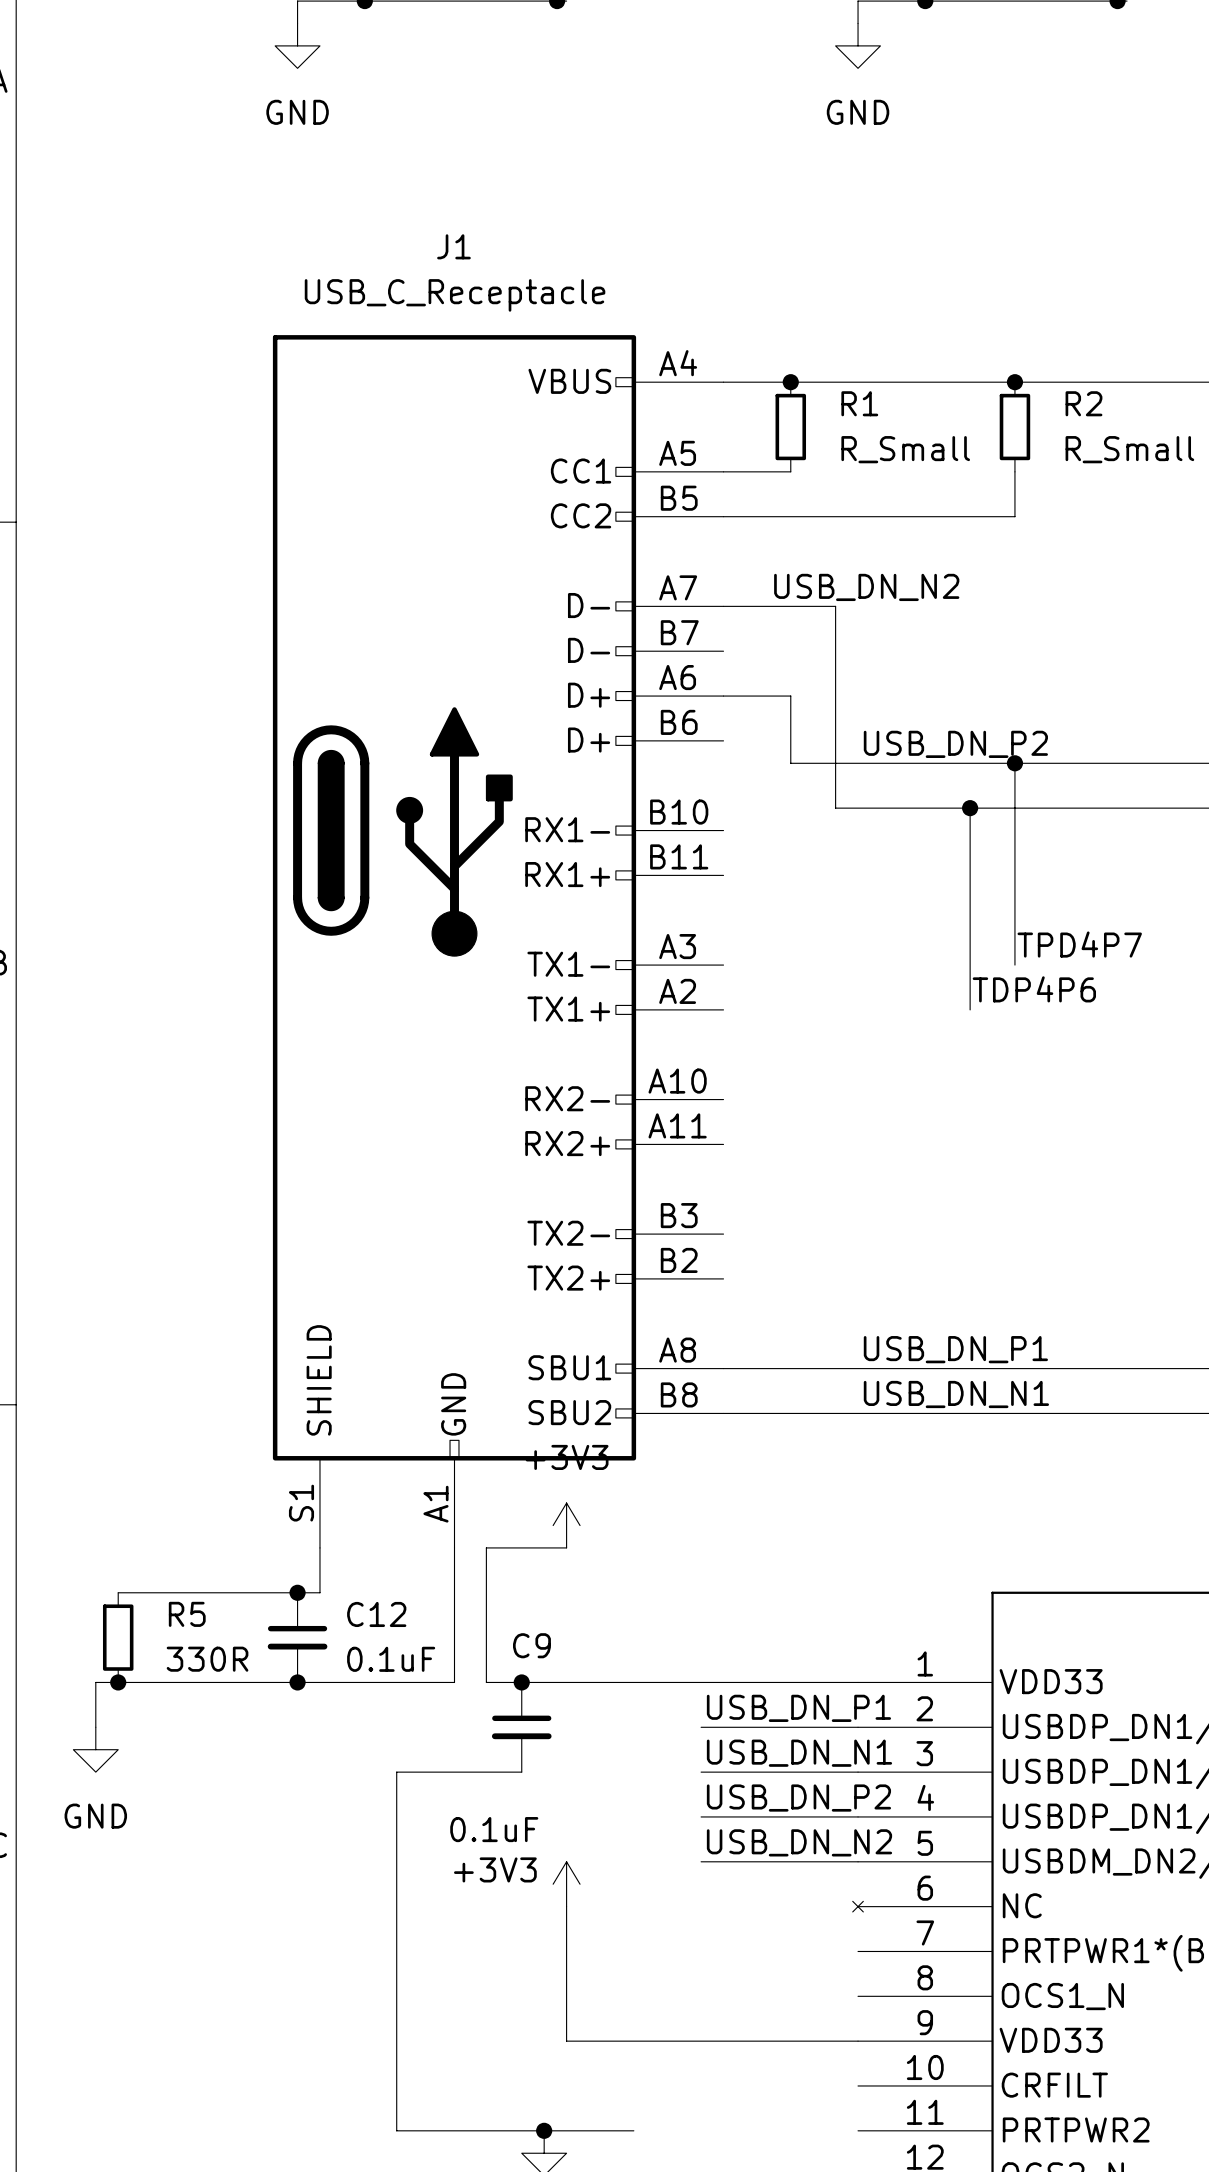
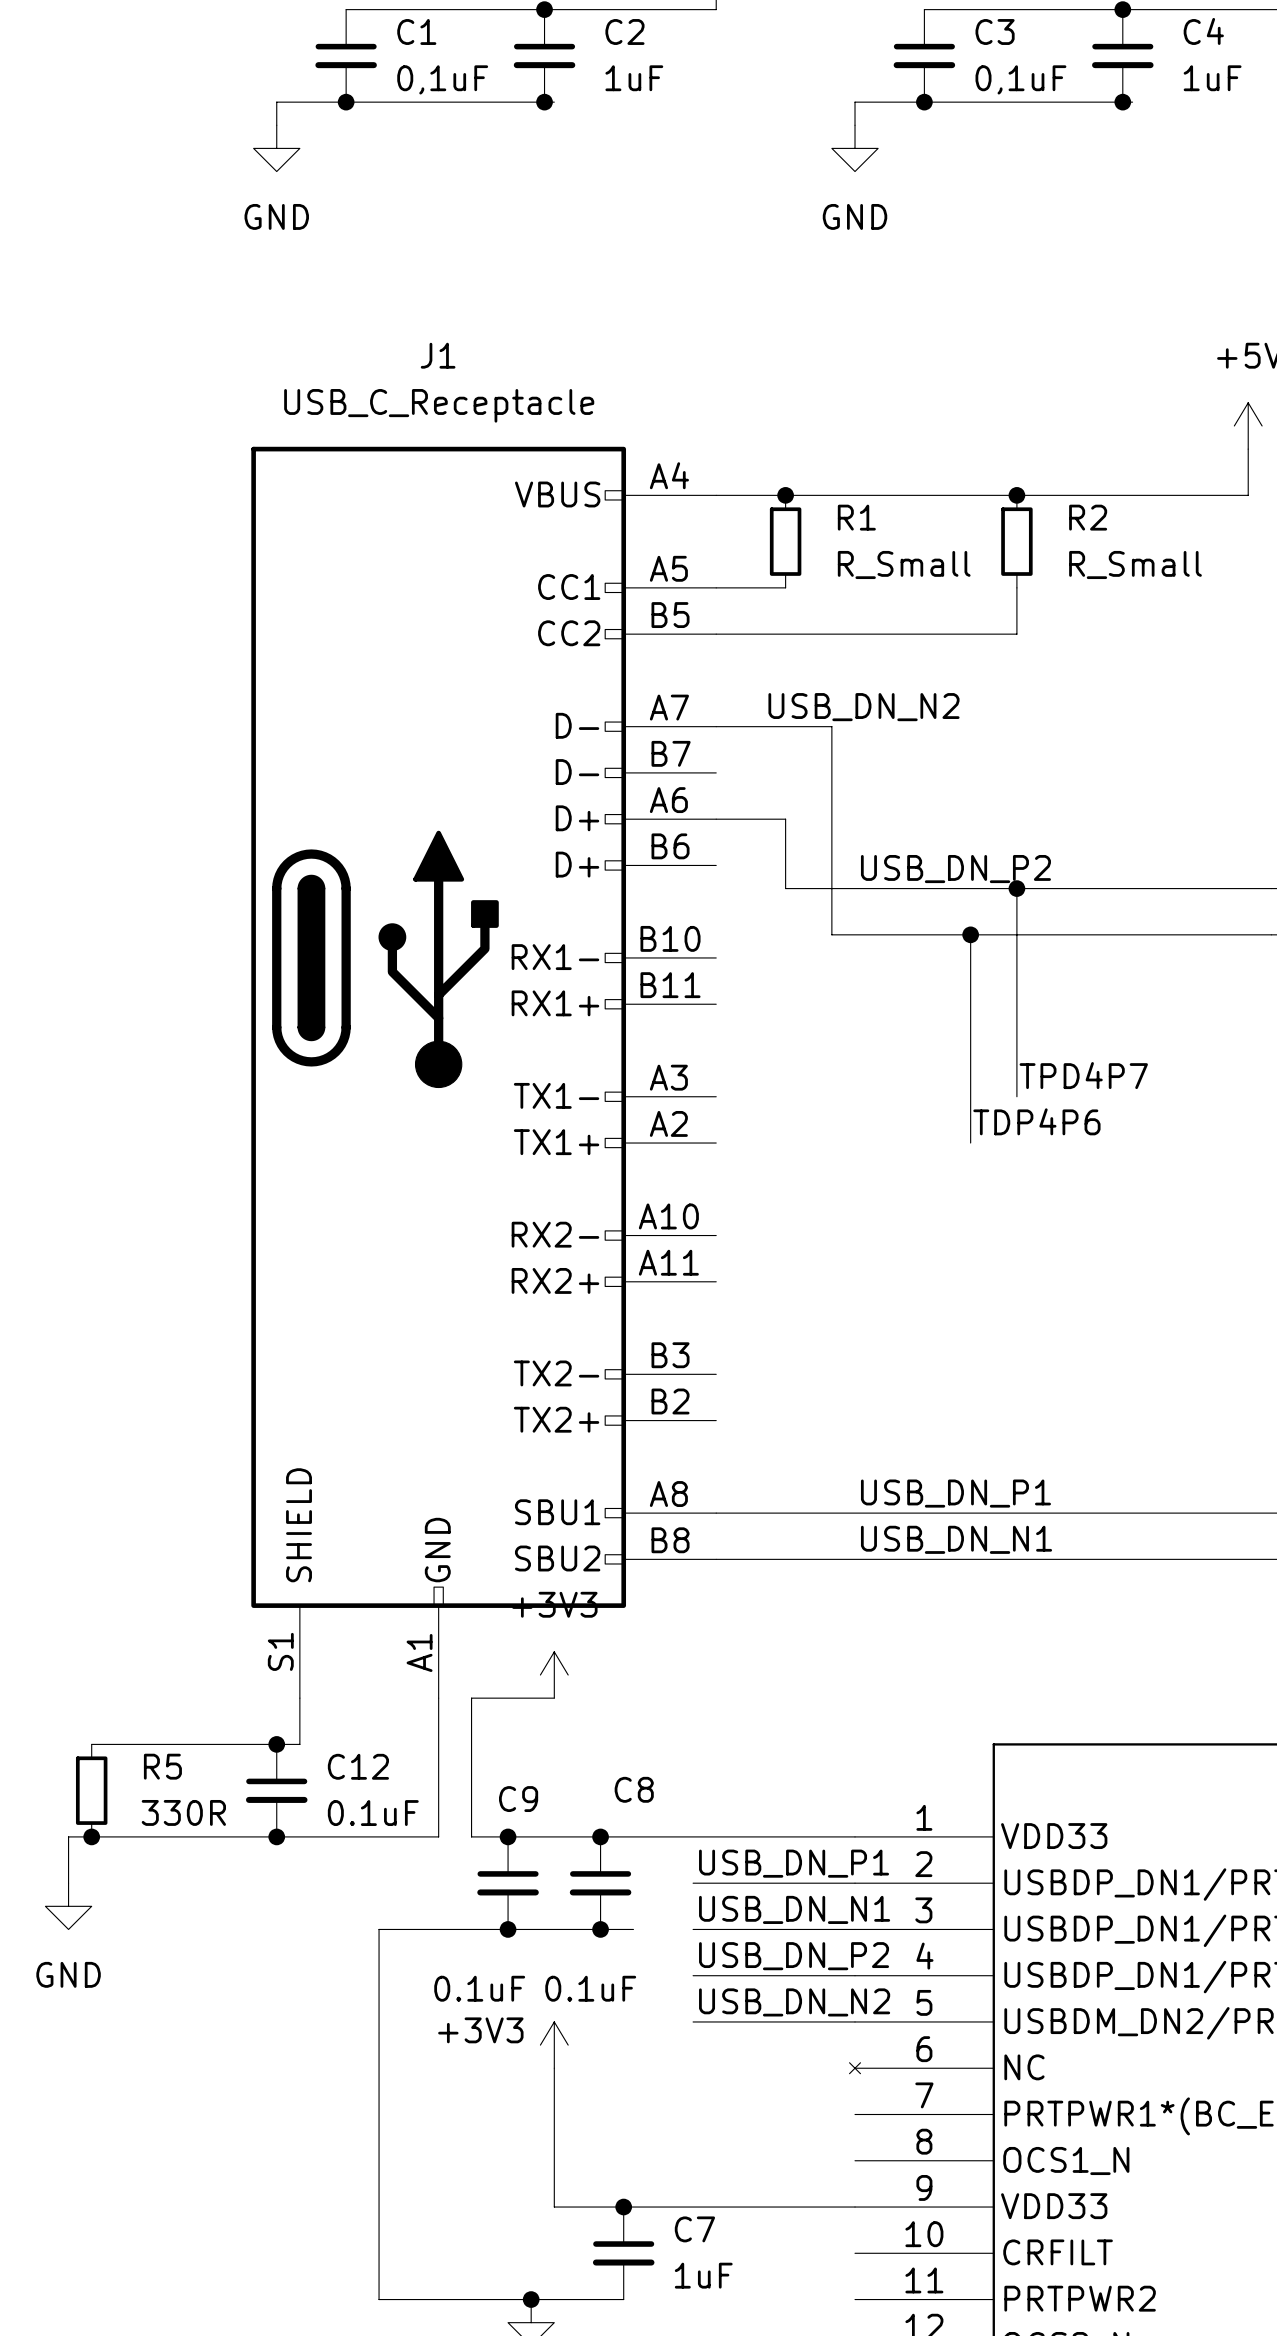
junction: none -> (600, 1836)
C8: none -> 0.1uF (600, 1883)
wire: none -> (508, 1929) (633, 1929)
junction: none -> (508, 1929)
junction: none -> (600, 1929)
junction: none -> (623, 2207)
C7: none -> 1uF (623, 2253)

